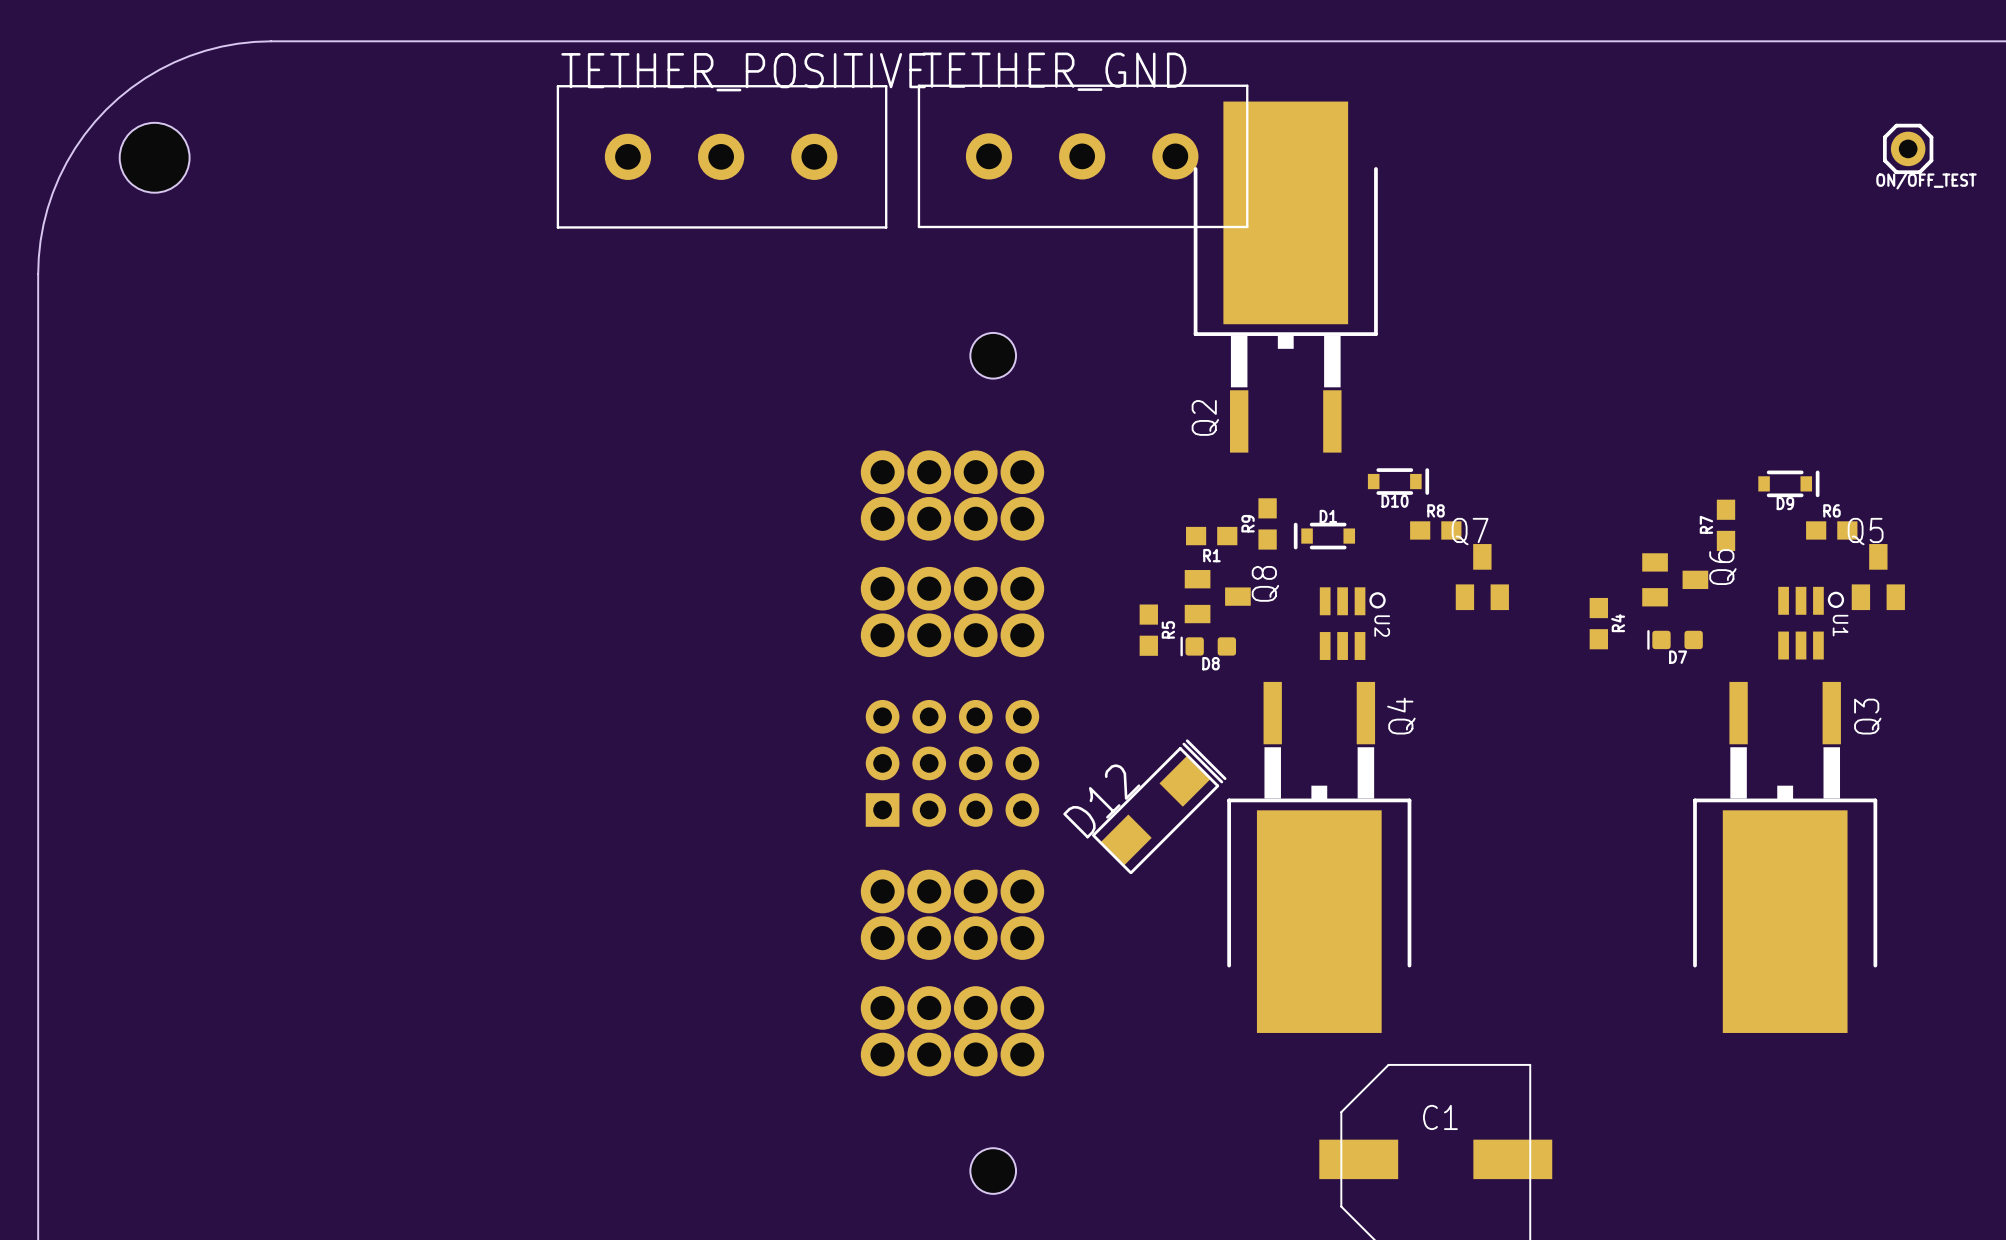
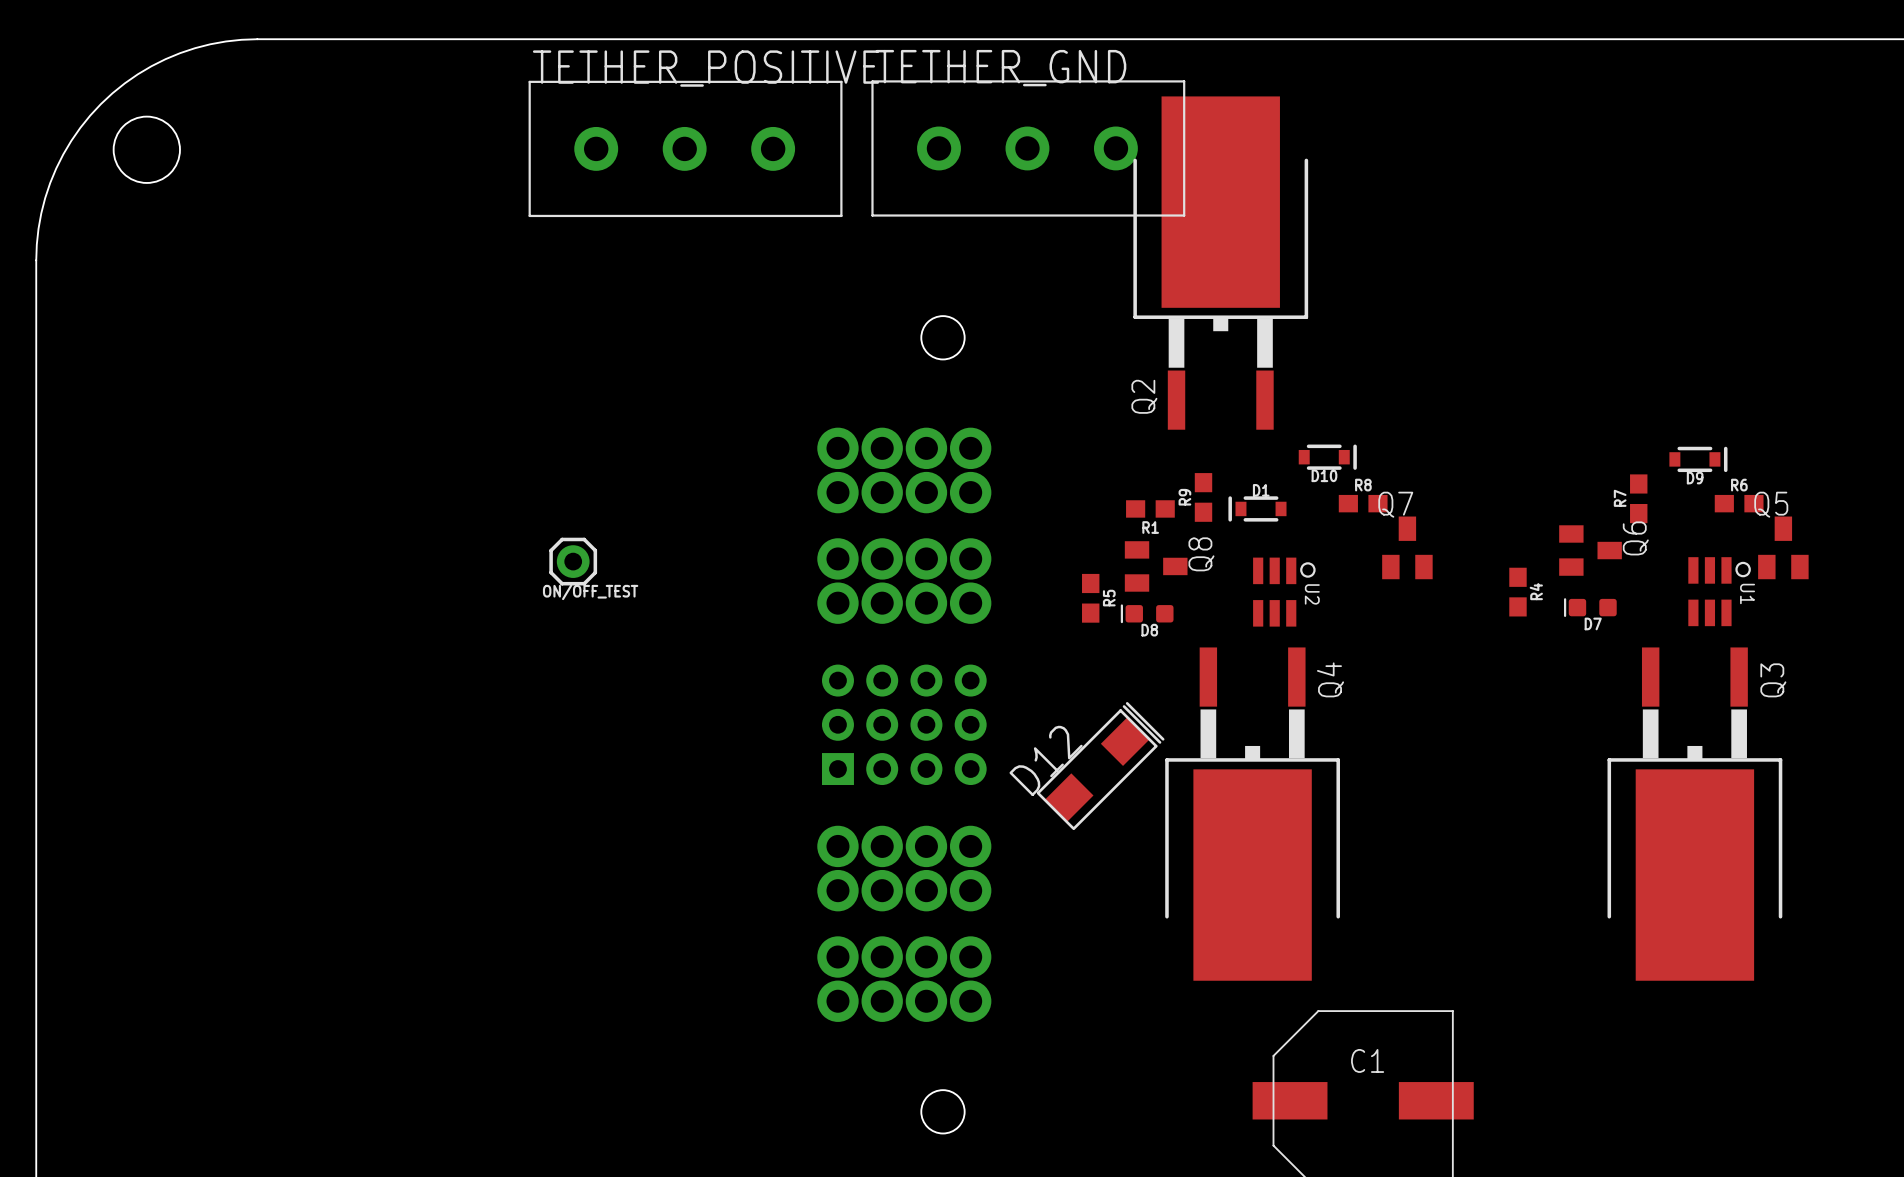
ON/OFF_TEST: (1908, 148) -> none
ON/OFF_TEST: none -> (573, 561)

